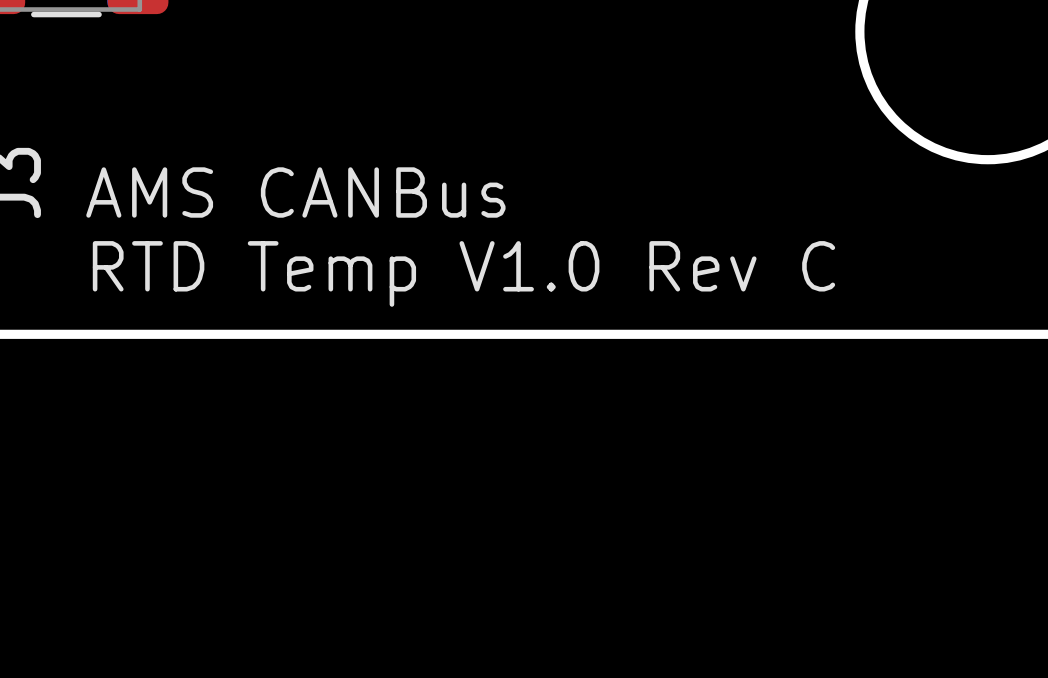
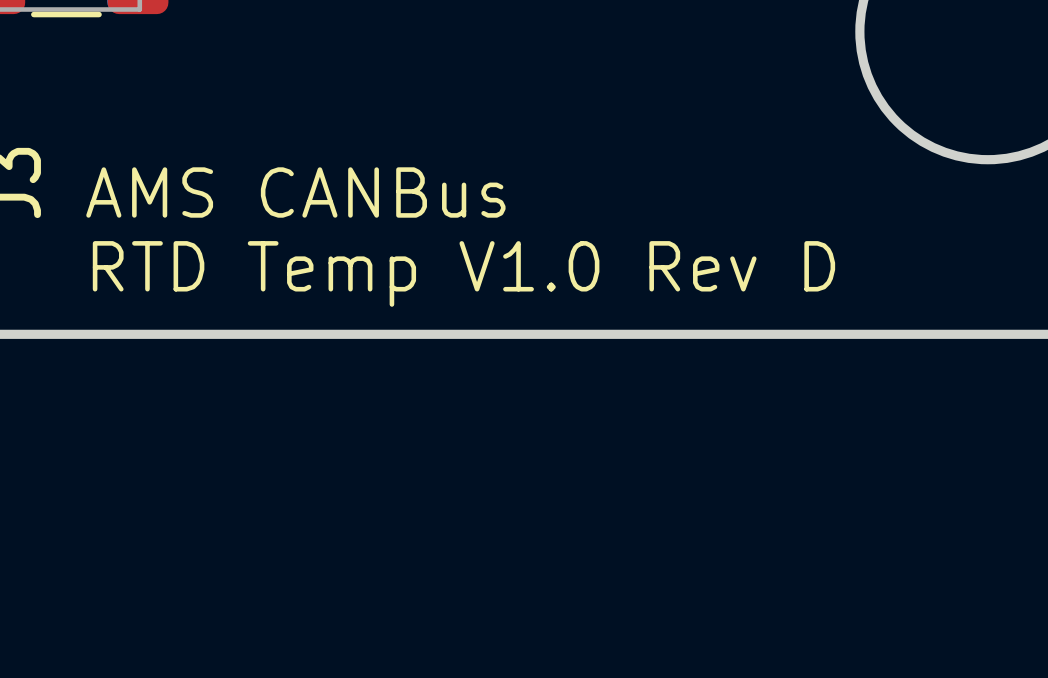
text: RTD Temp V1.0 Rev C (463, 273) -> RTD Temp V1.0 Rev D (463, 273)

